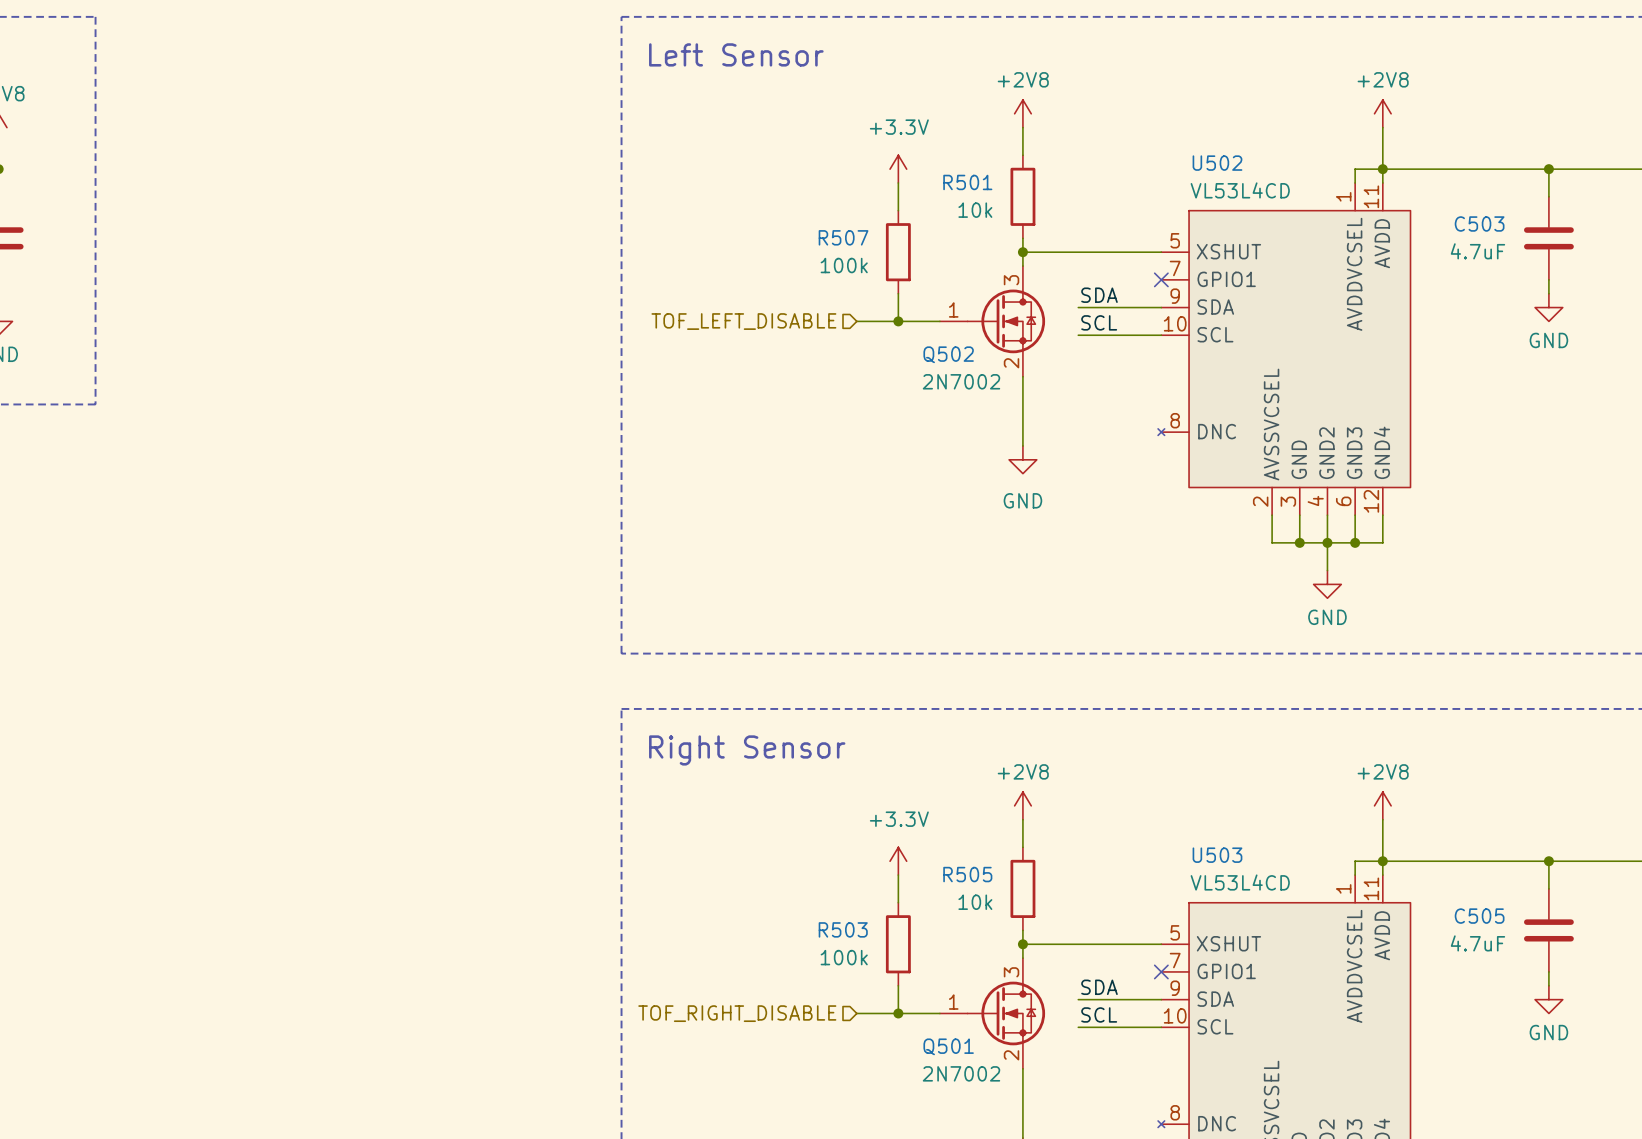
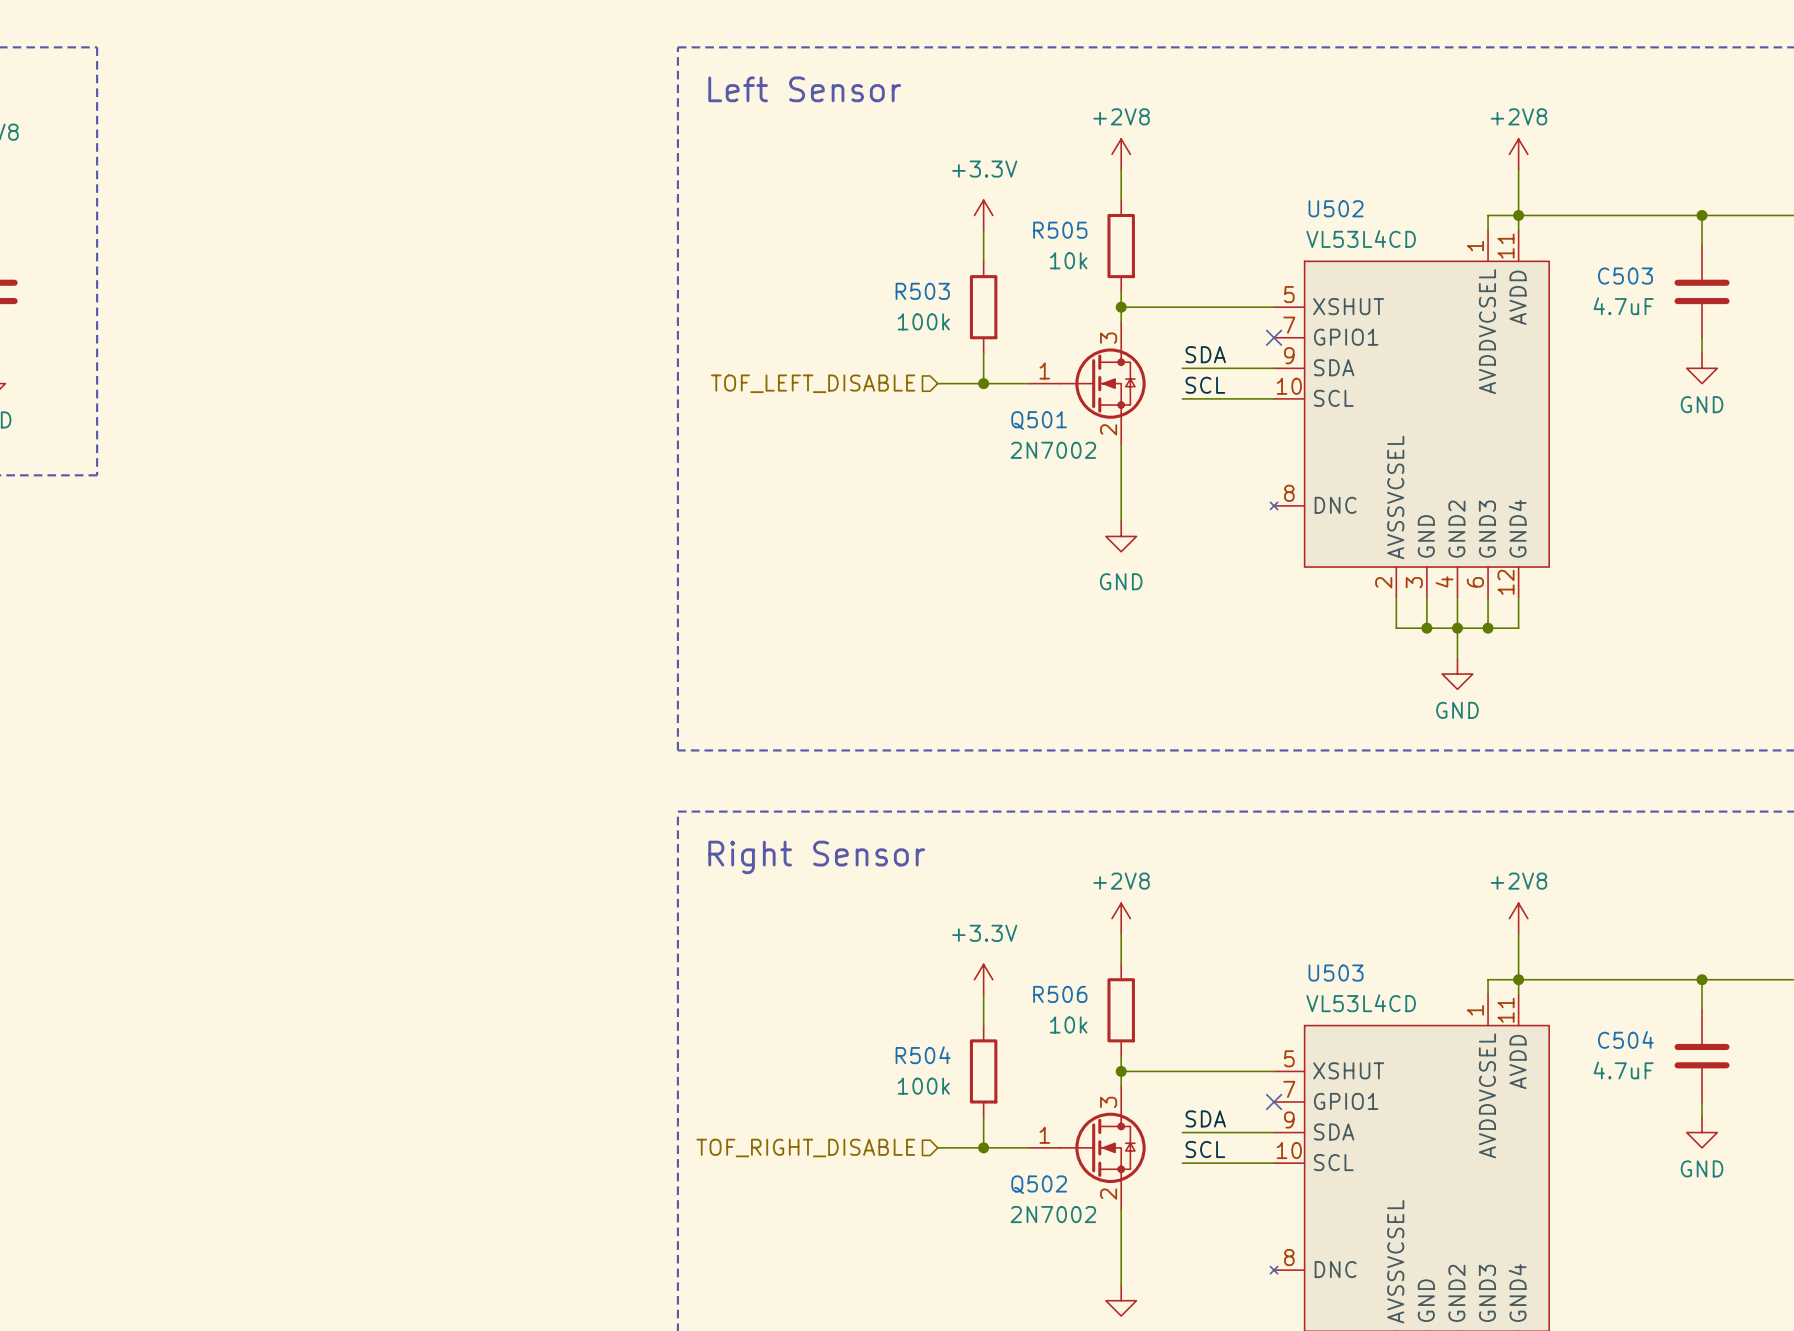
R501 name: R501 (967, 182) -> R505 (1060, 230)
R507 name: R507 (843, 237) -> R503 (922, 291)
Q502 name: Q502 (948, 354) -> Q501 (1039, 420)
R505 name: R505 (967, 874) -> R506 (1060, 994)
C505 name: C505 (1479, 916) -> C504 (1625, 1039)
R503 name: R503 (843, 929) -> R504 (923, 1055)
Q501 name: Q501 (948, 1046) -> Q502 (1039, 1184)

